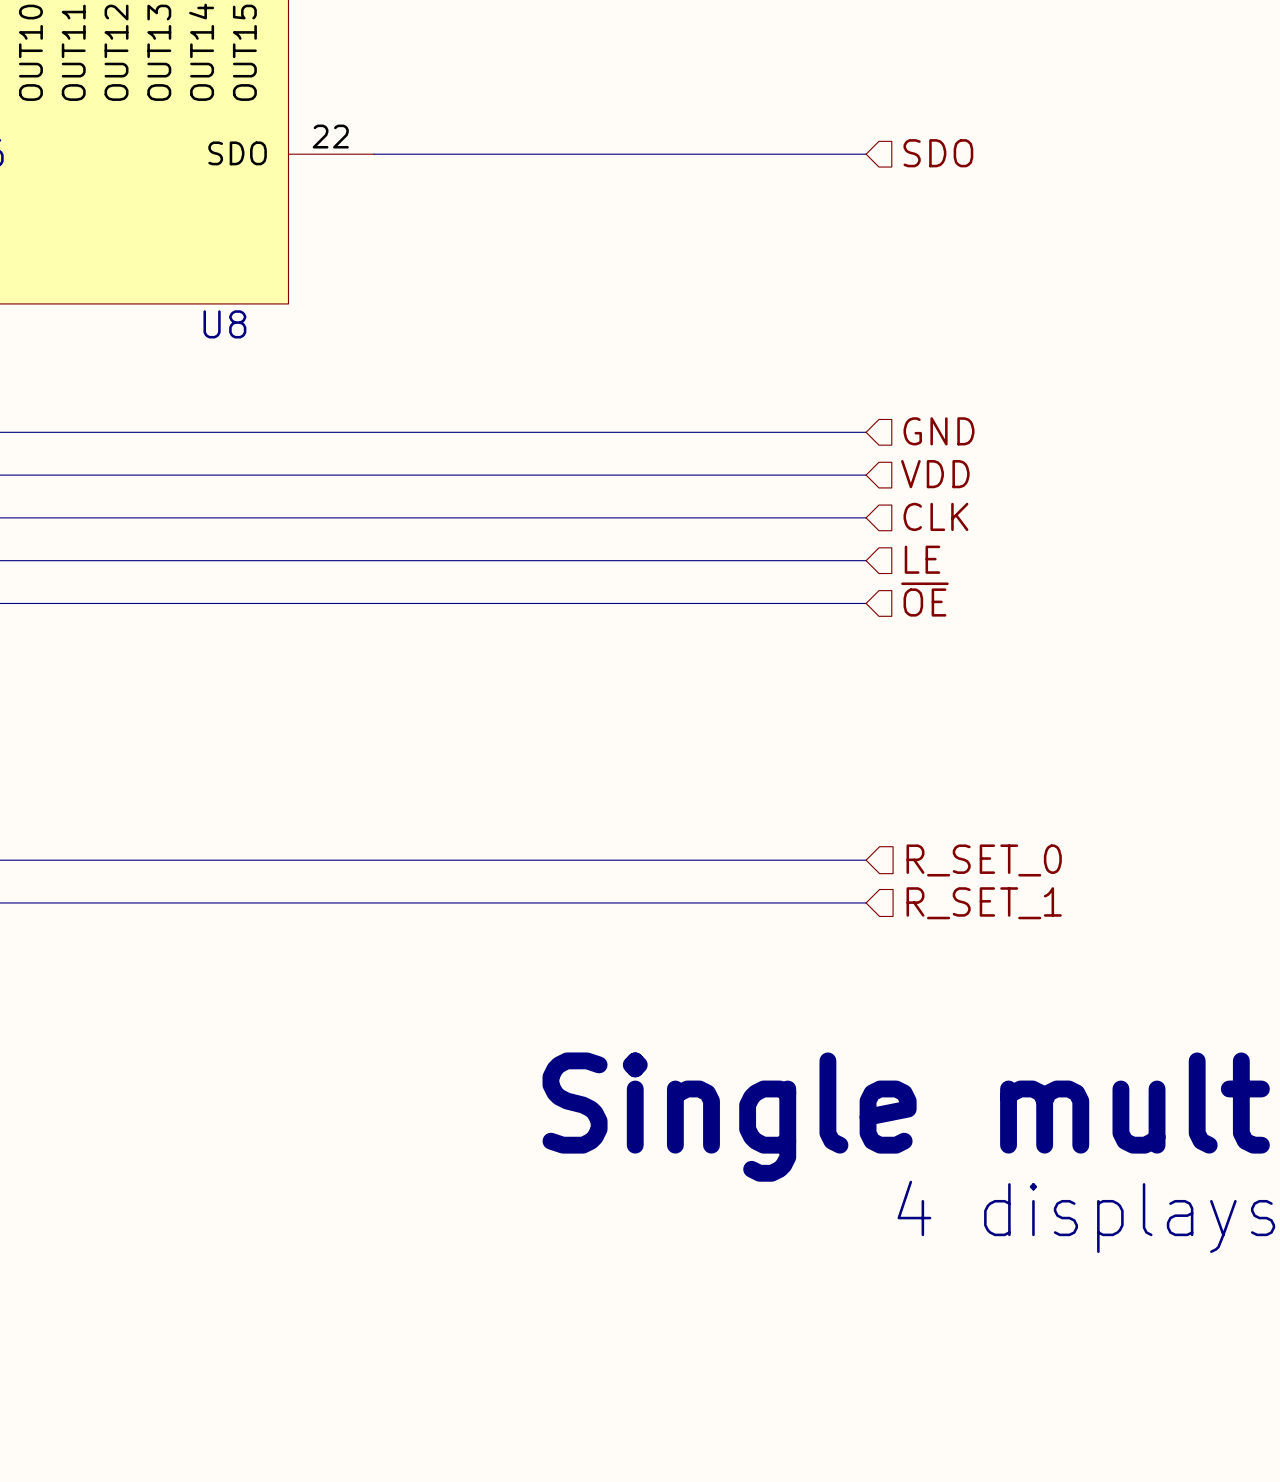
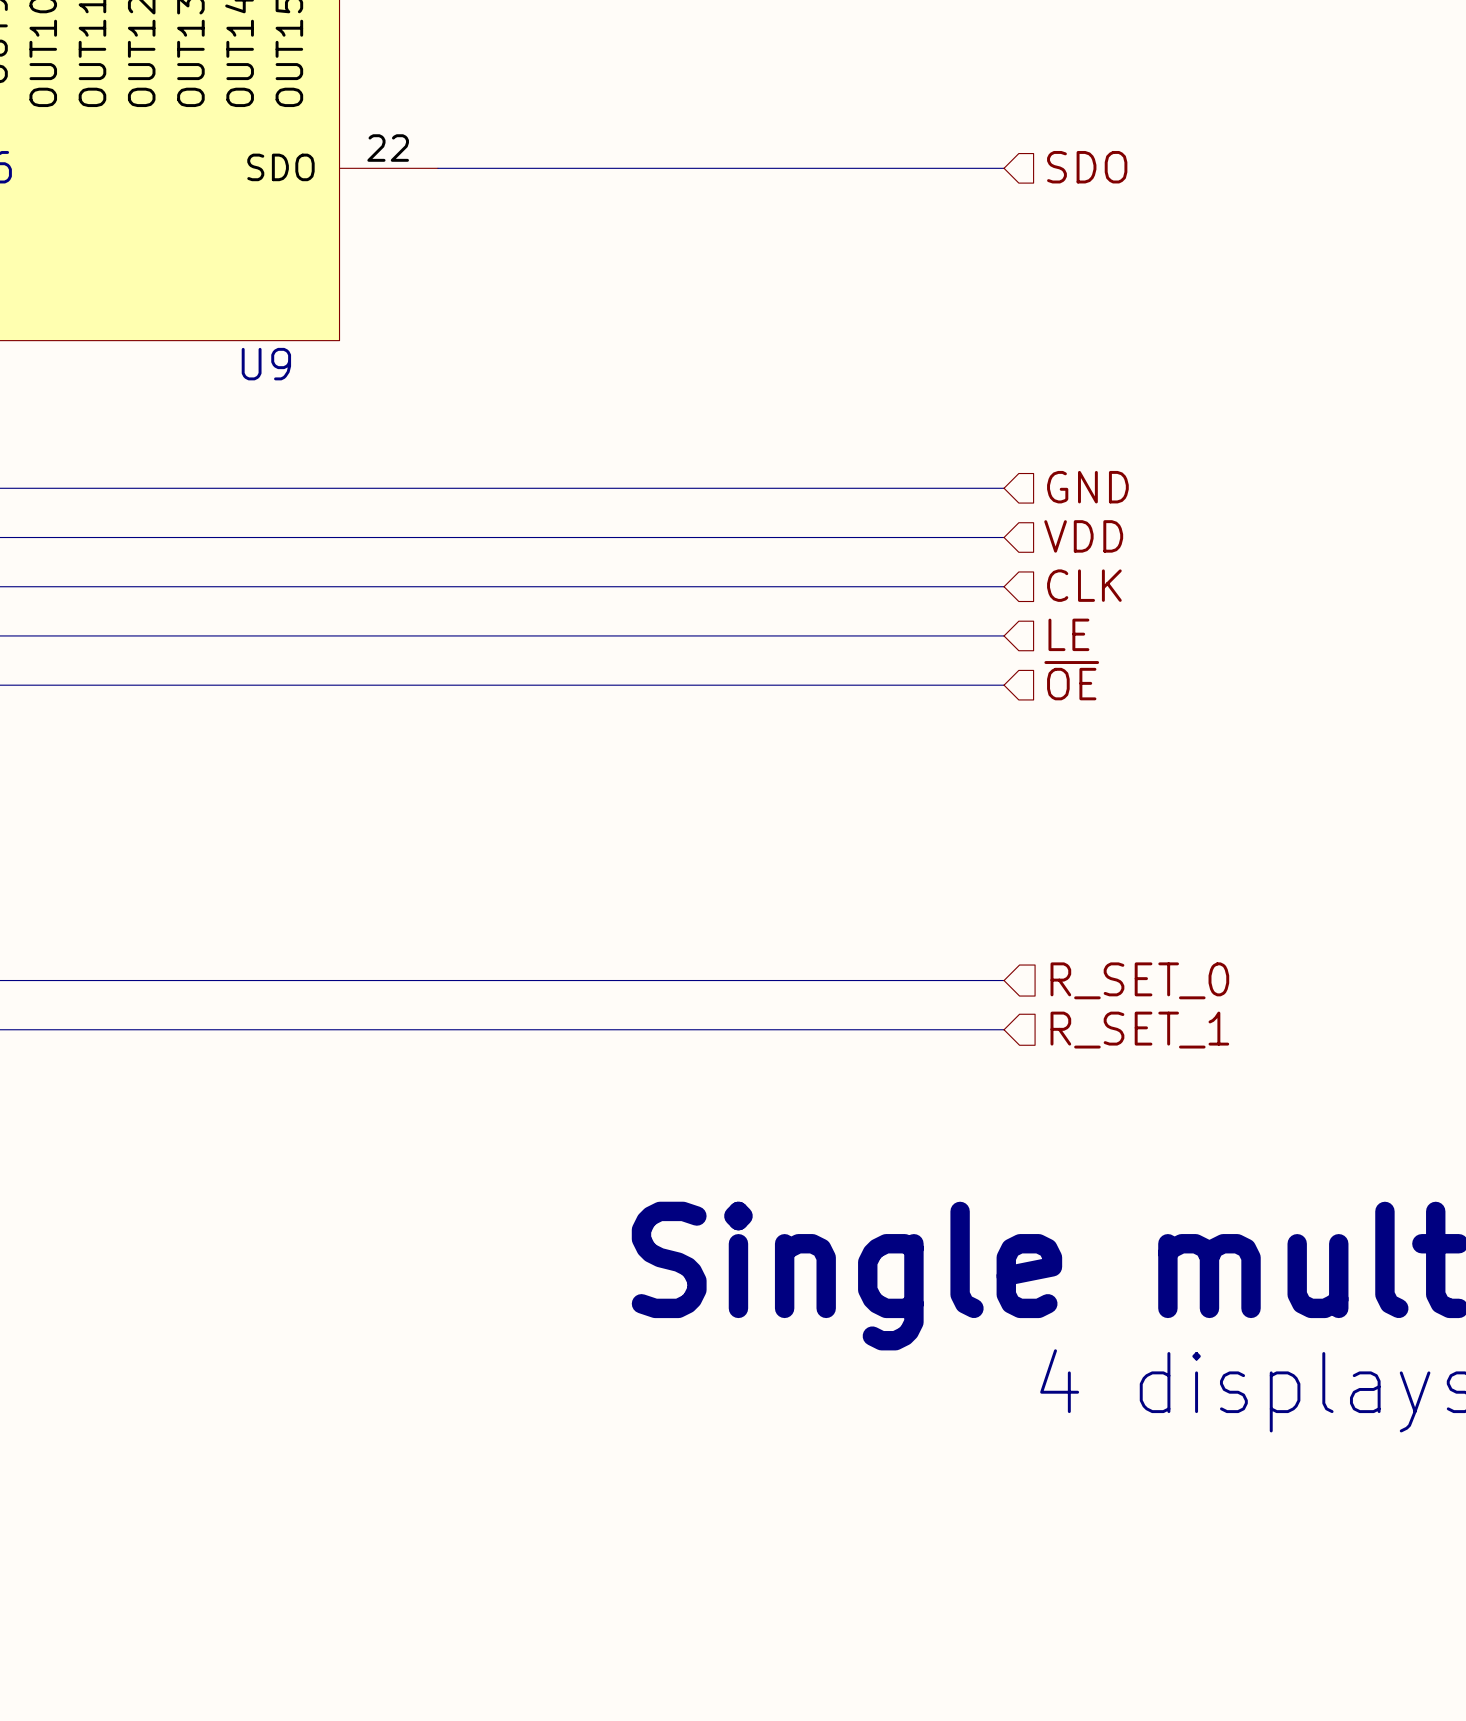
U8 name: U8 (224, 324) -> U9 (266, 364)

